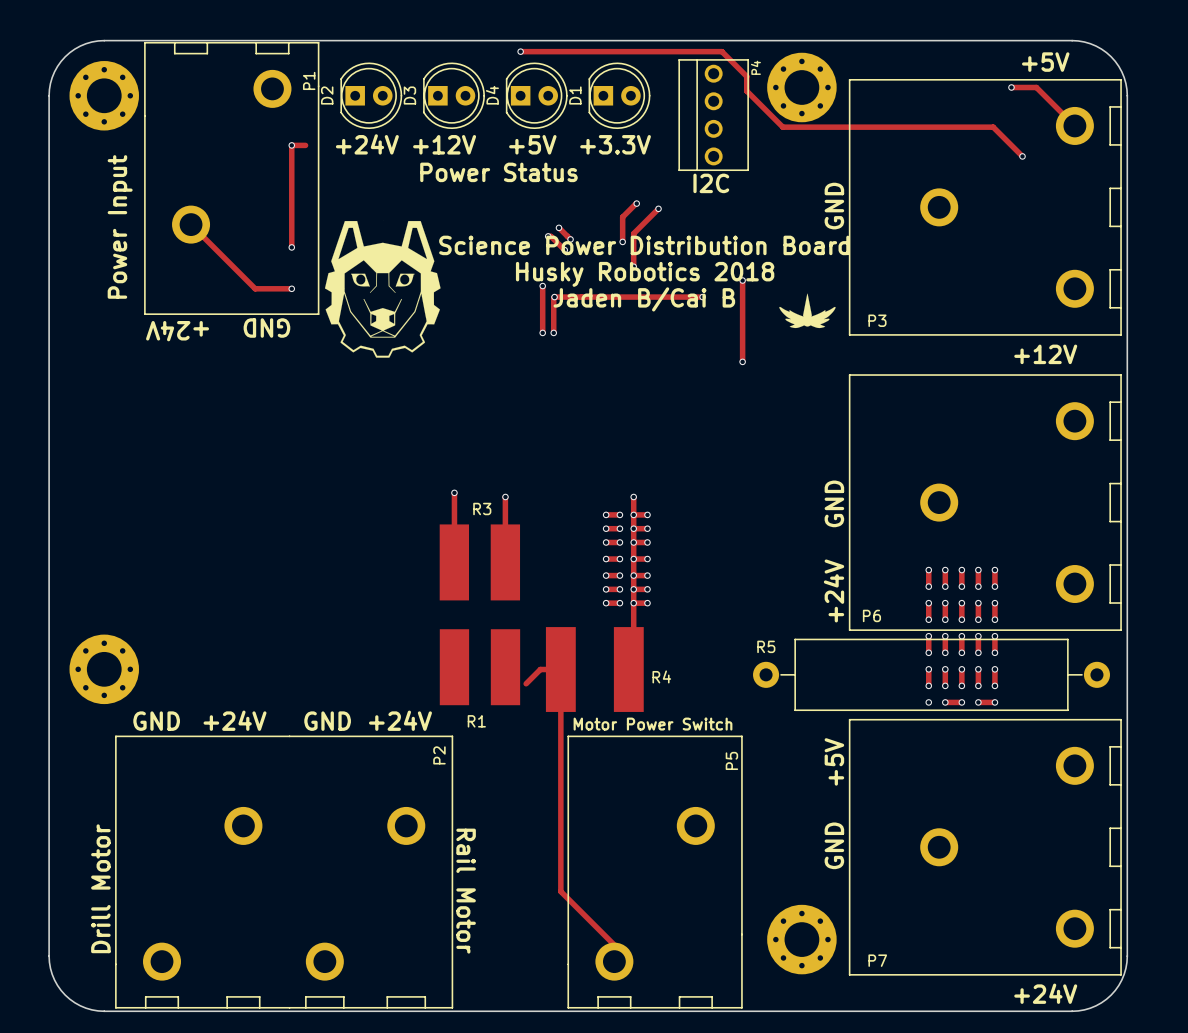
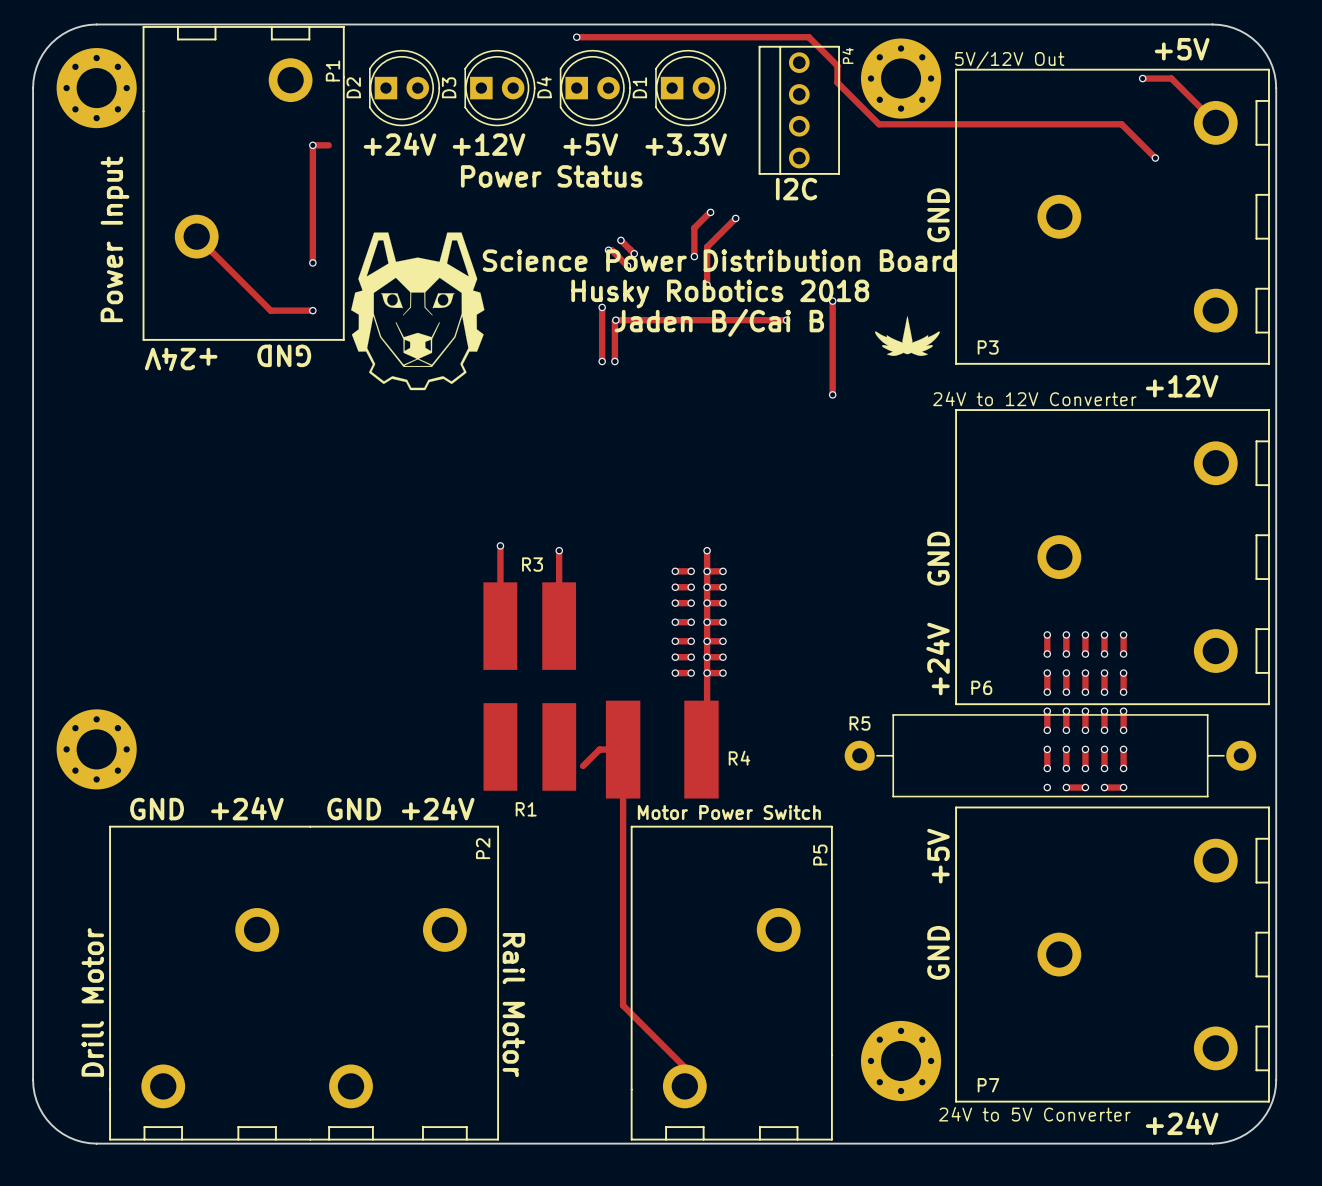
text: none -> 5V/12V Out (1009, 60)
text: none -> 24V to 12V Converter (1034, 398)
text: none -> 24V to 5V Converter (1034, 1114)

